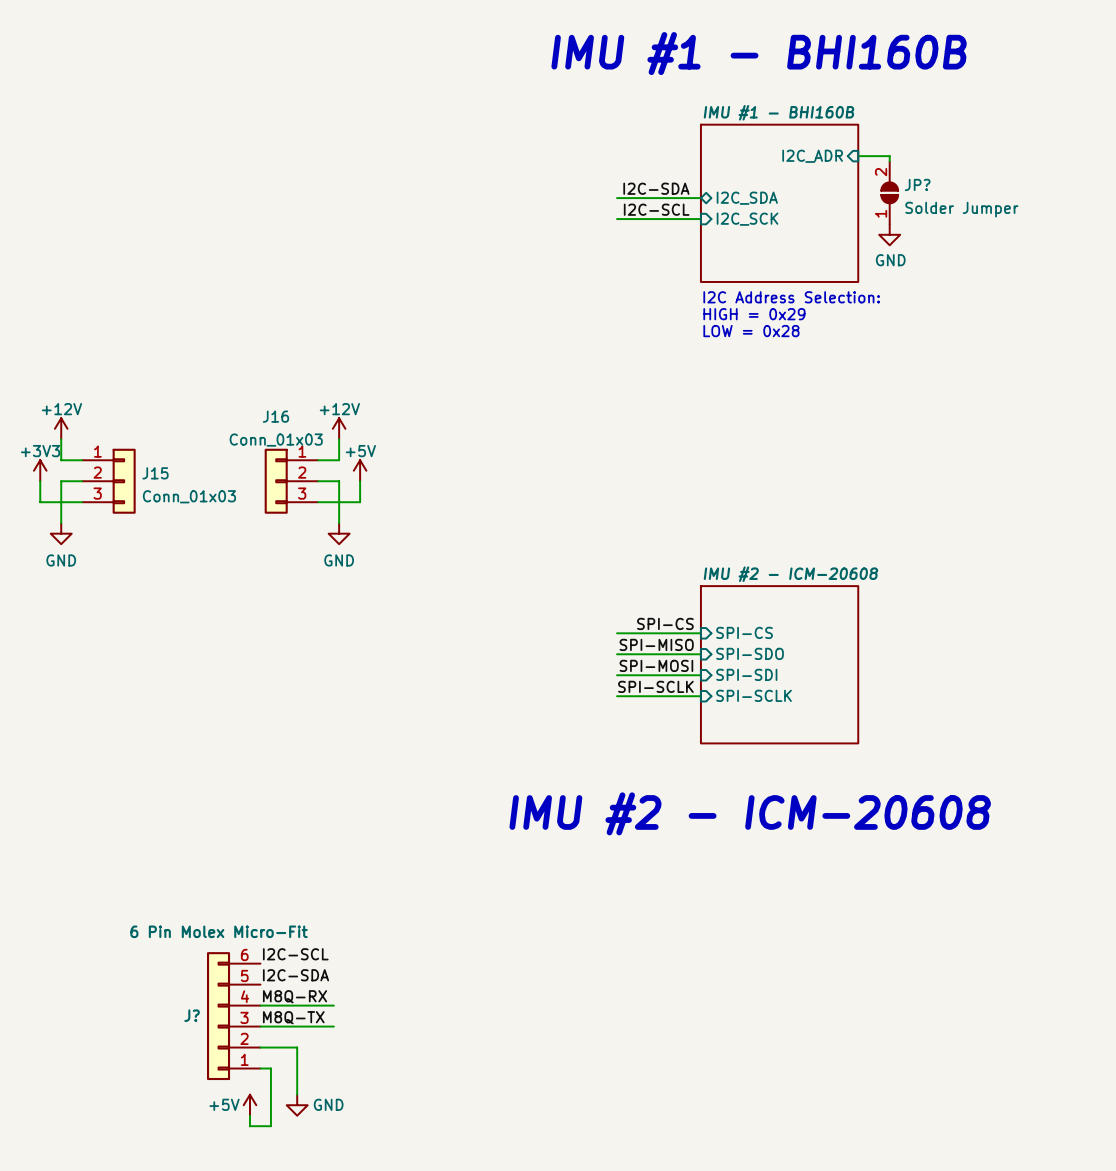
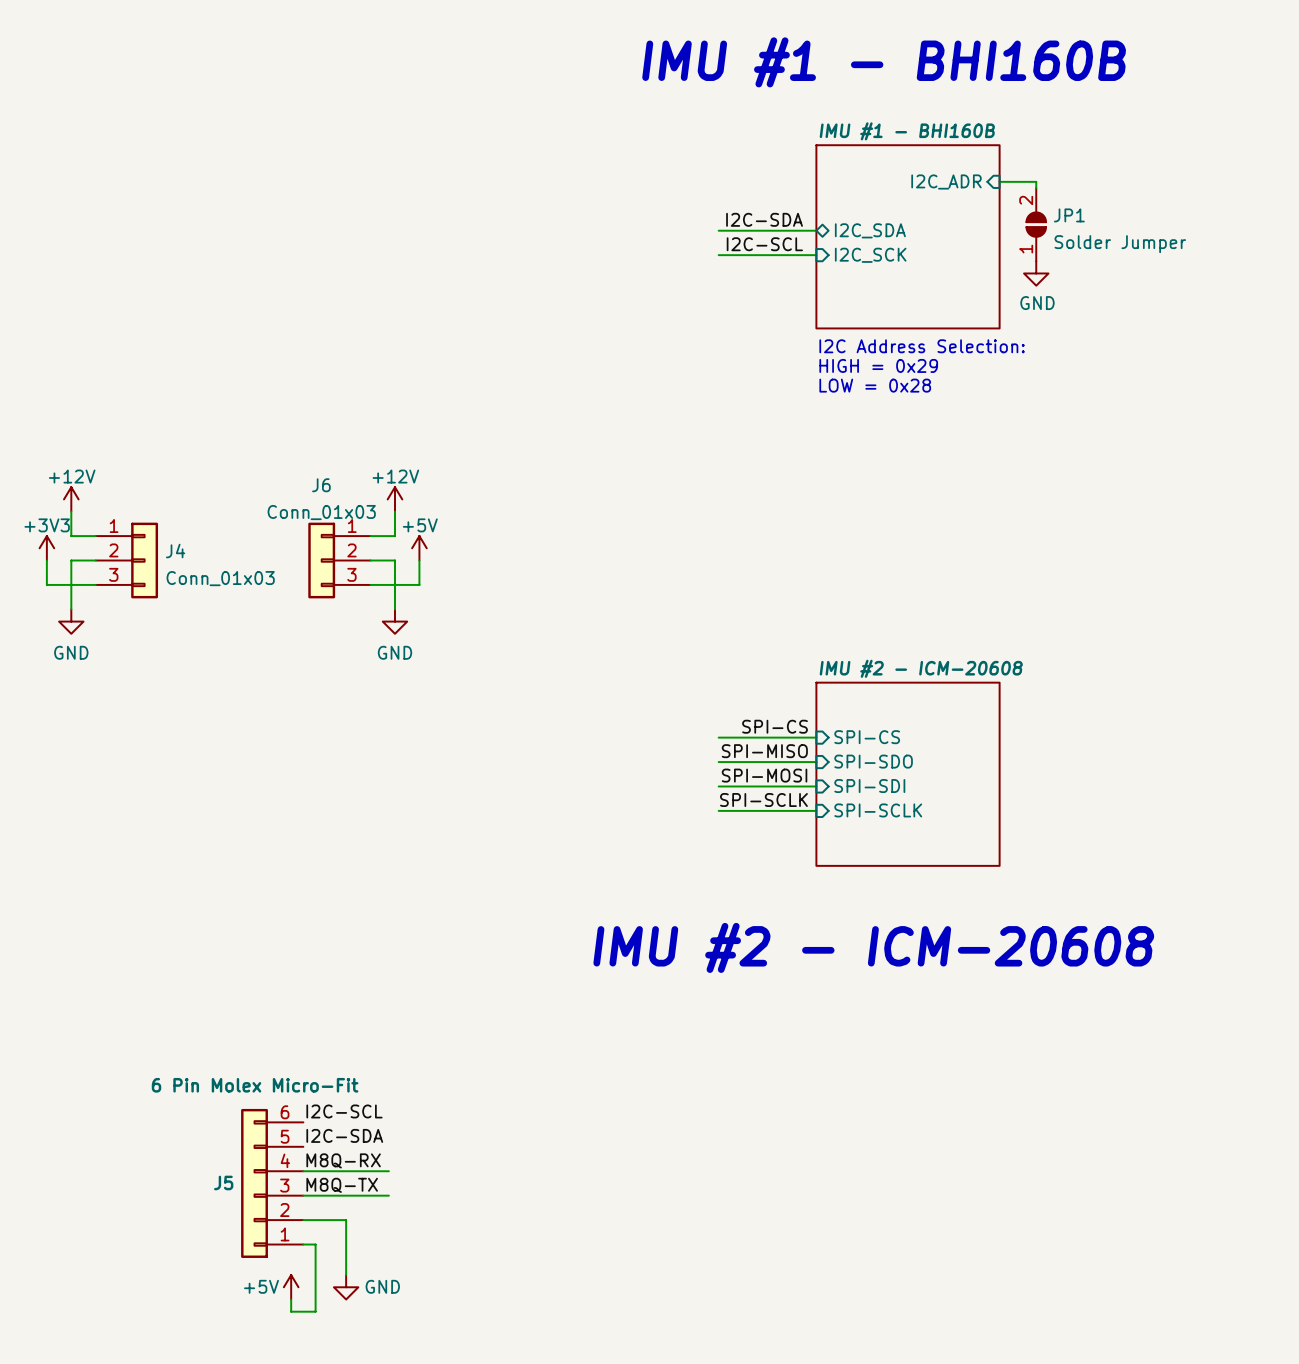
JP? name: JP? (917, 184) -> JP1 (1069, 215)
J16 name: J16 (275, 416) -> J6 (321, 485)
J15 name: J15 (155, 473) -> J4 (175, 551)
J? name: J? (192, 1015) -> J5 (223, 1182)

